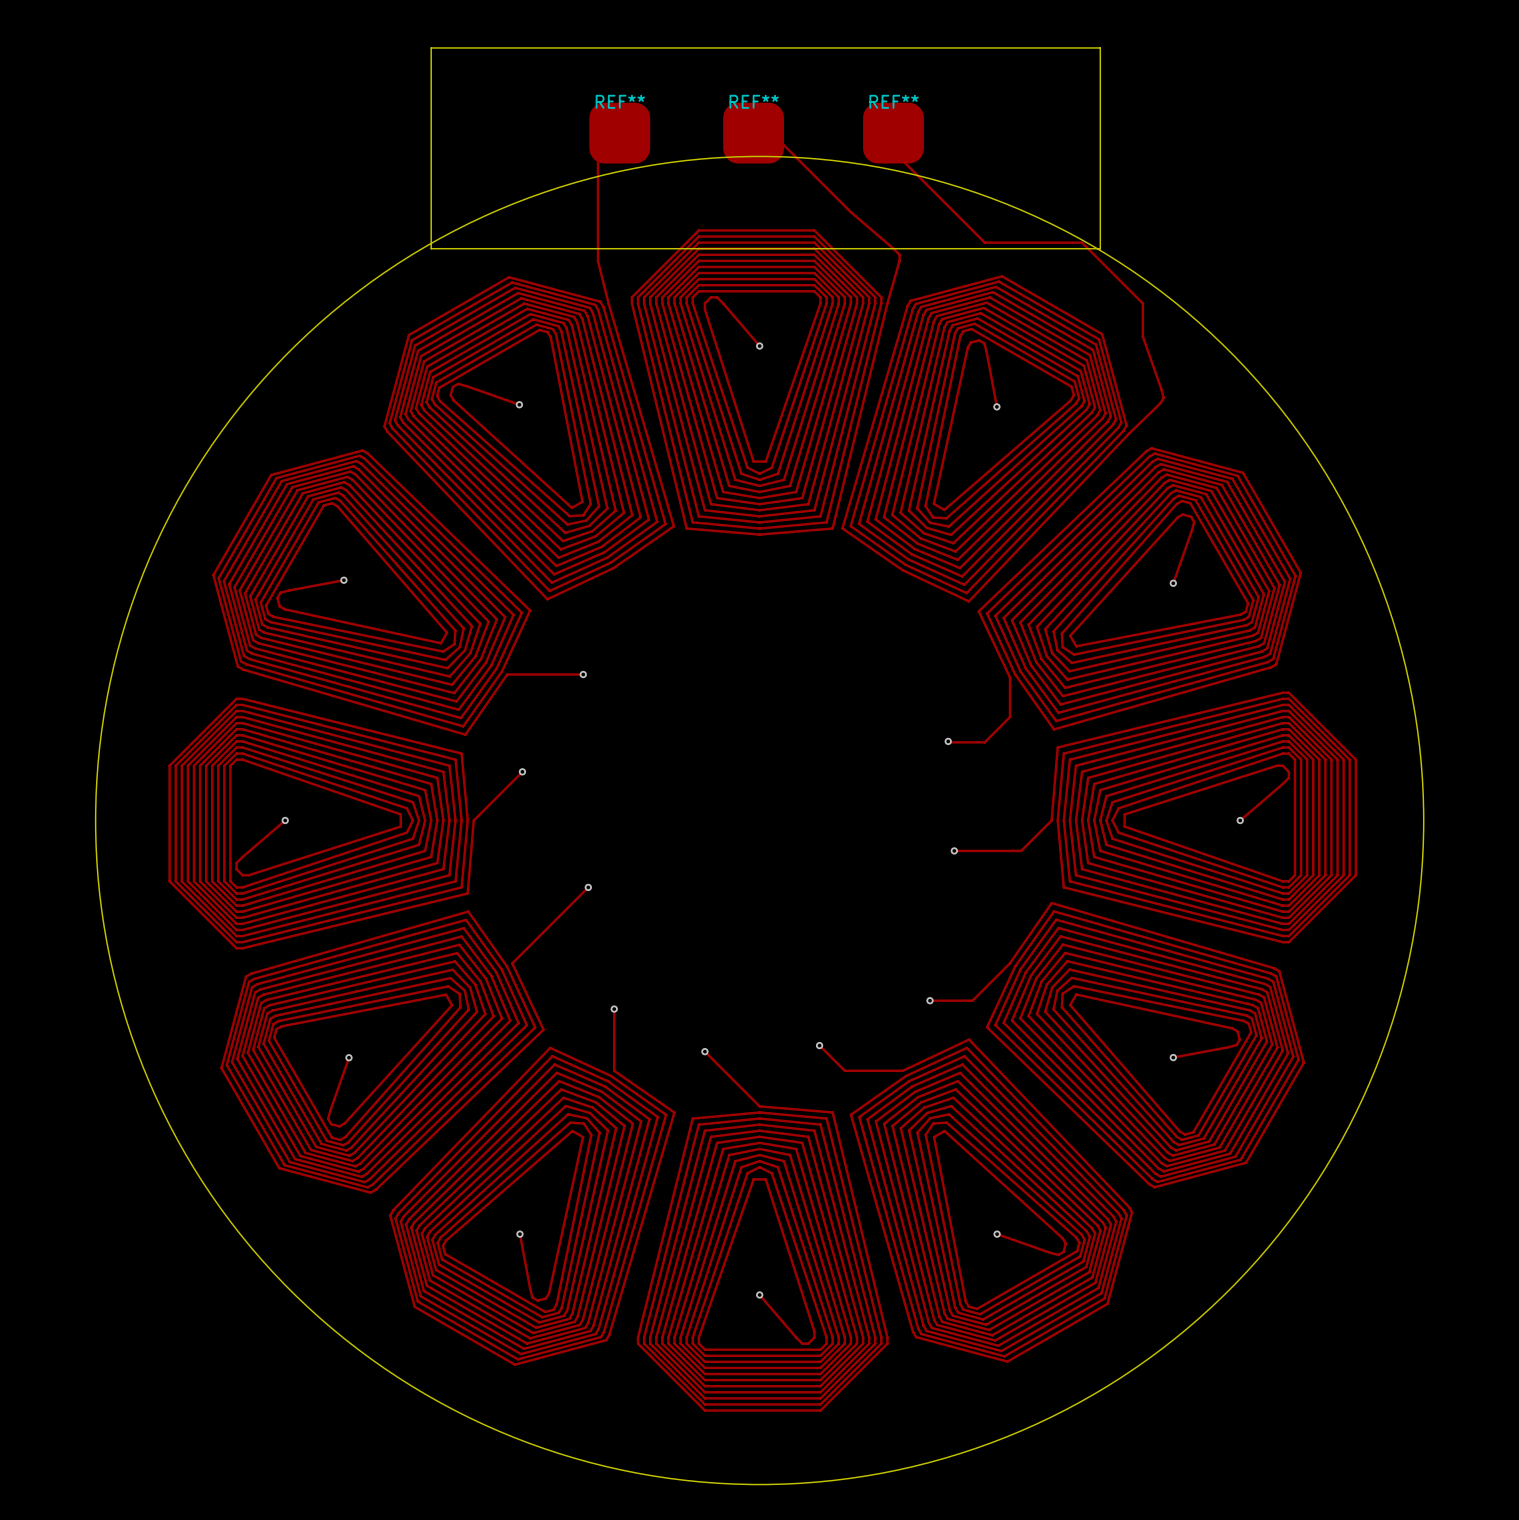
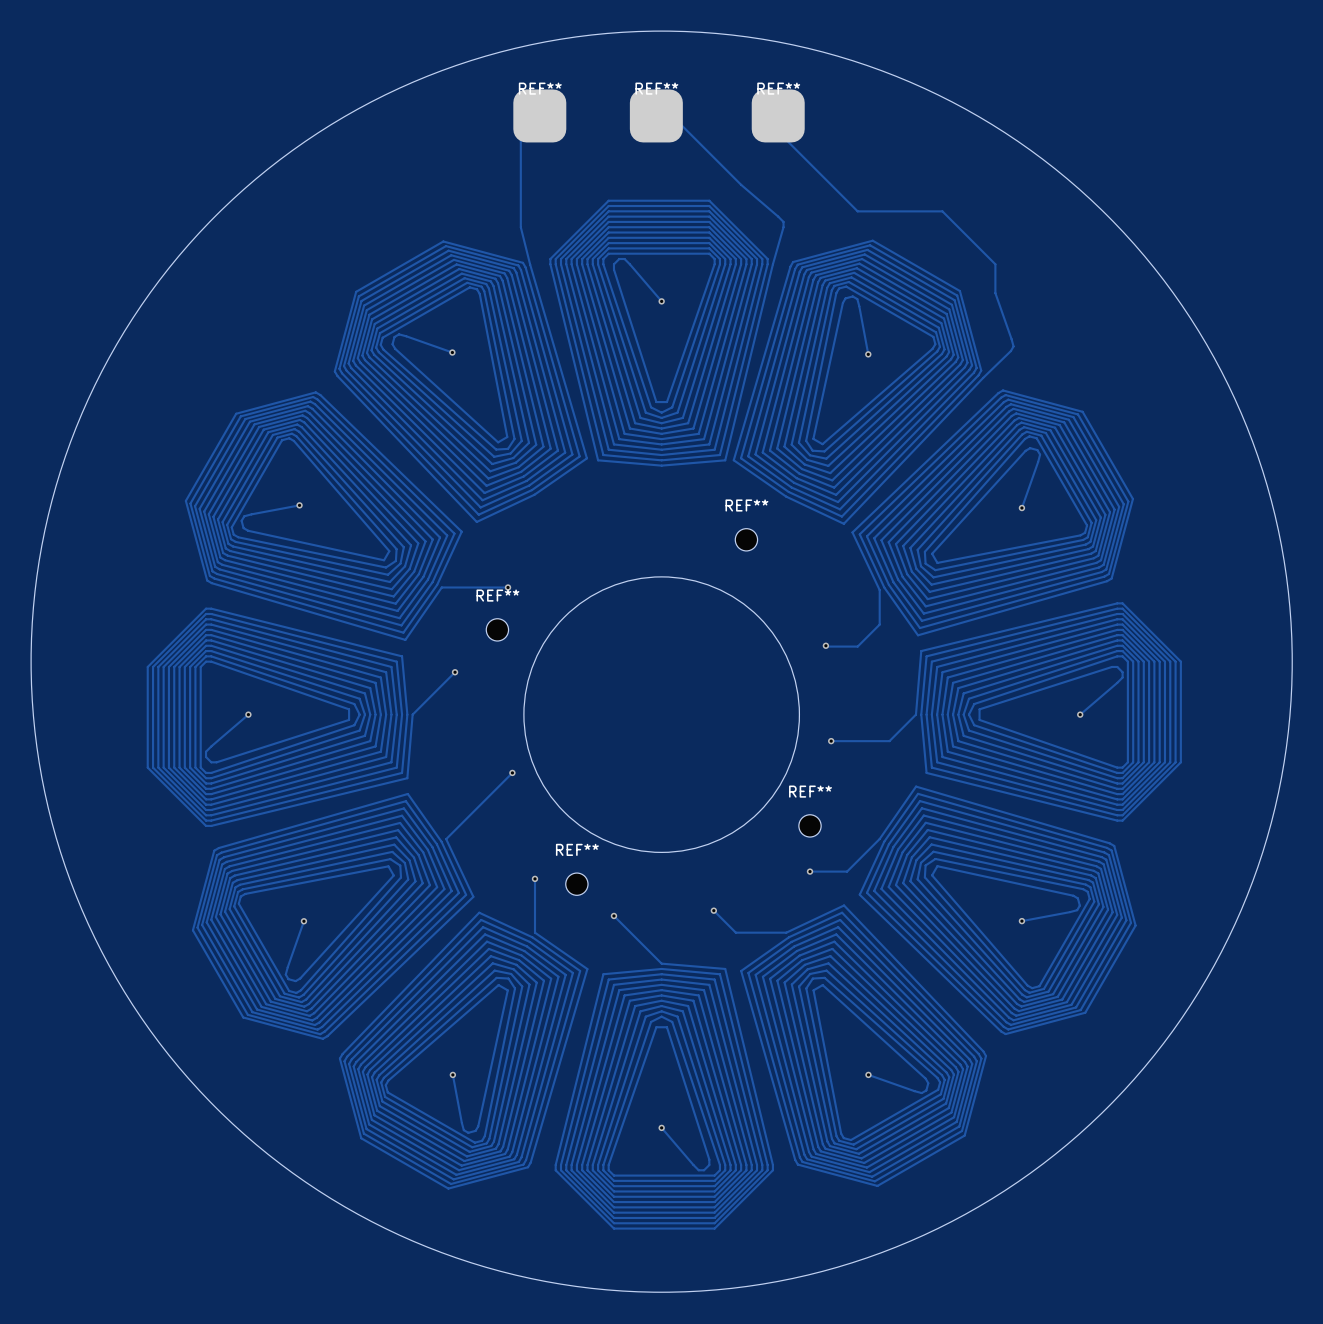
round board edge: none -> [30, 30, 1293, 1293]
board edge: (431, 47) (1100, 47) (1100, 248) (431, 248) (431, 47) -> none
round board edge size: [95, 156, 1425, 1485] -> [523, 576, 800, 853]
REF**: none -> (746, 539)
REF**: none -> (497, 629)
REF**: none -> (810, 825)
REF**: none -> (576, 884)

